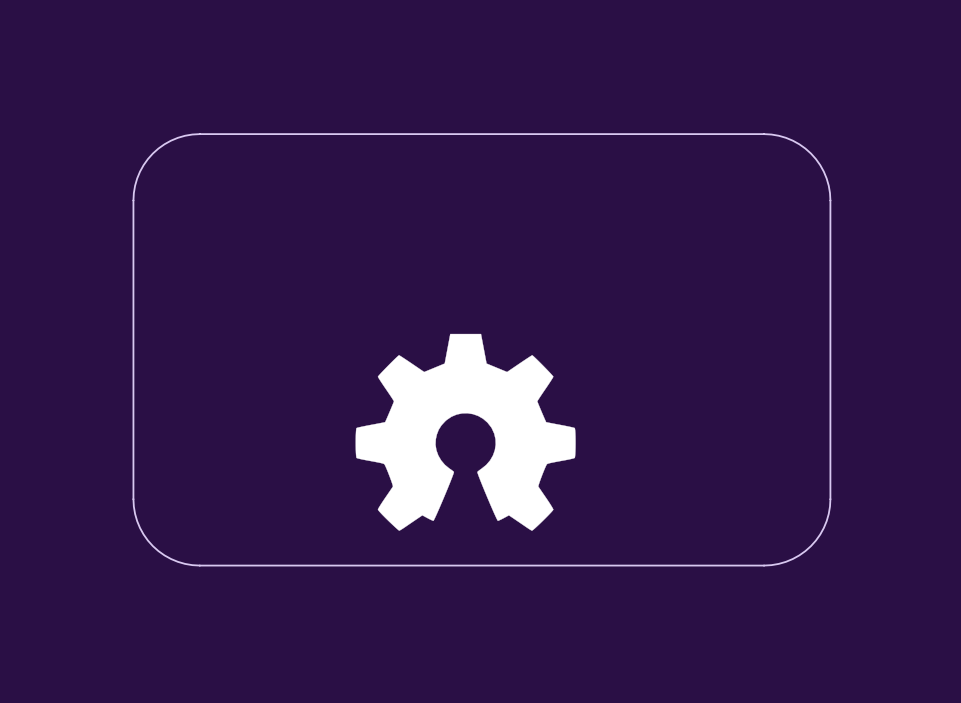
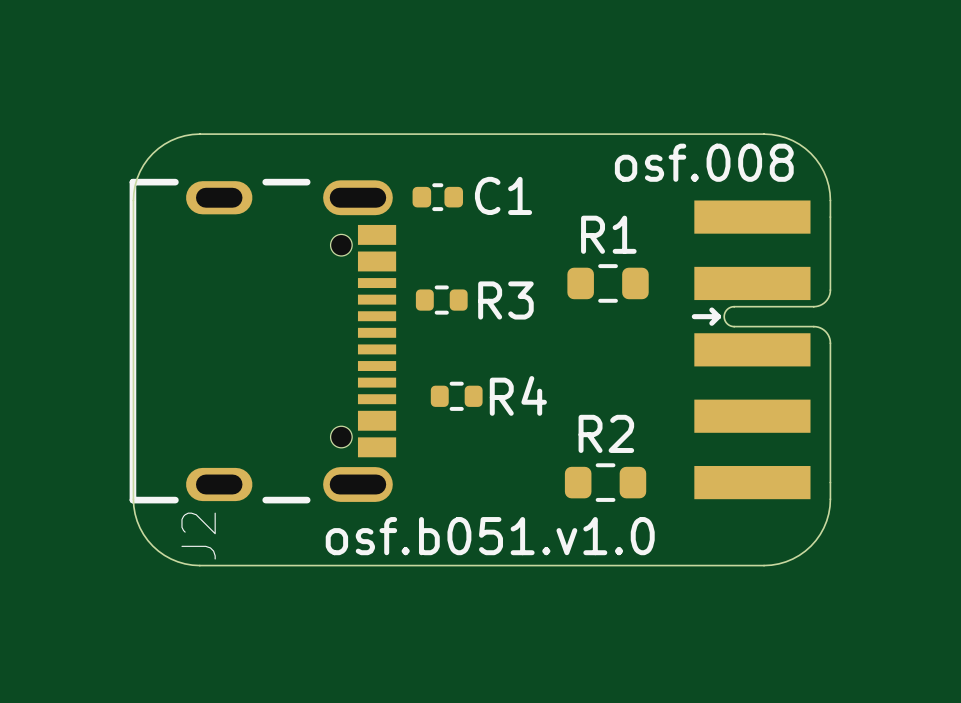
text: none -> osf.008 (704, 162)
C1: none -> (437, 197)
board edge: (830, 217) (830, 482) -> none
R1: none -> (608, 283)
R3: none -> (441, 300)
drawing: [355, 333, 576, 531] -> none
J2: none -> (262, 341)
part: none -> (761, 349)
R4: none -> (456, 396)
R2: none -> (605, 482)
text: none -> osf.b051.v1.0 (490, 536)

